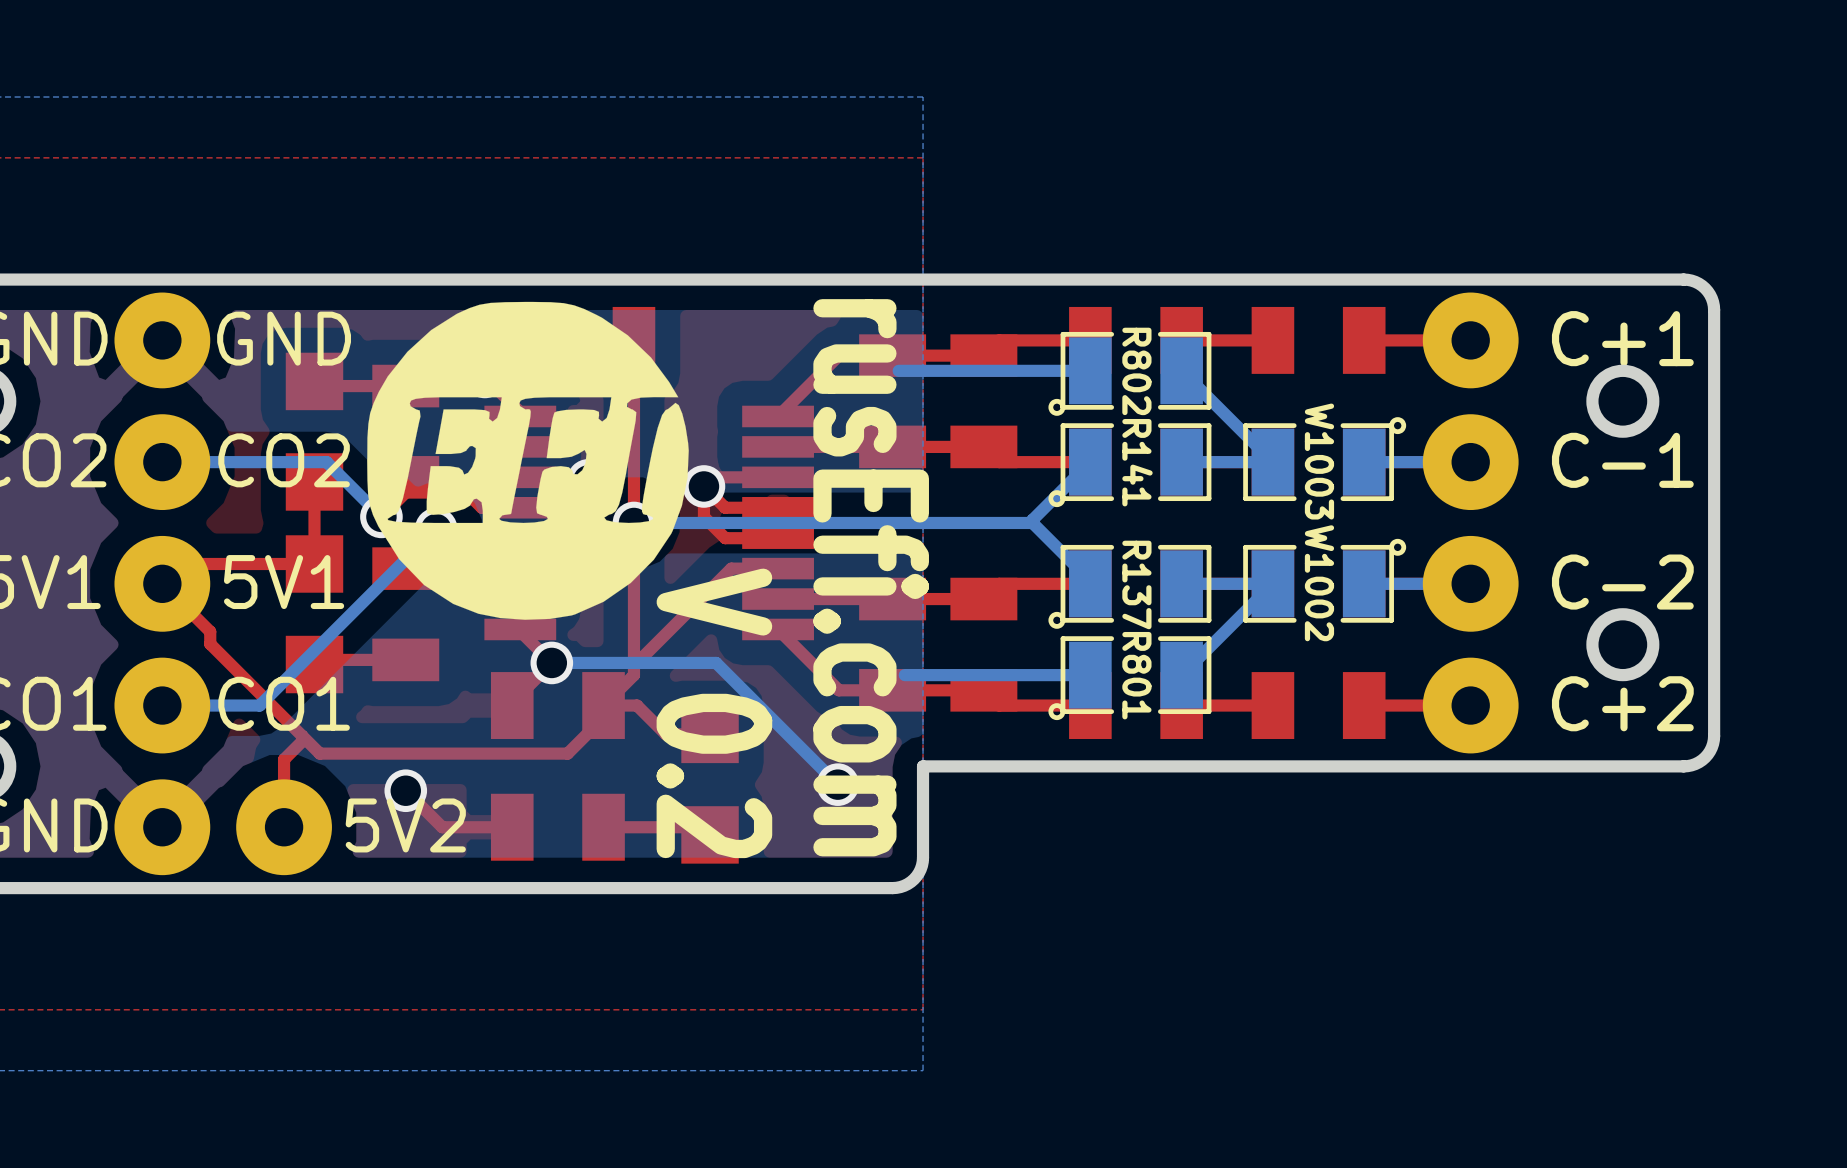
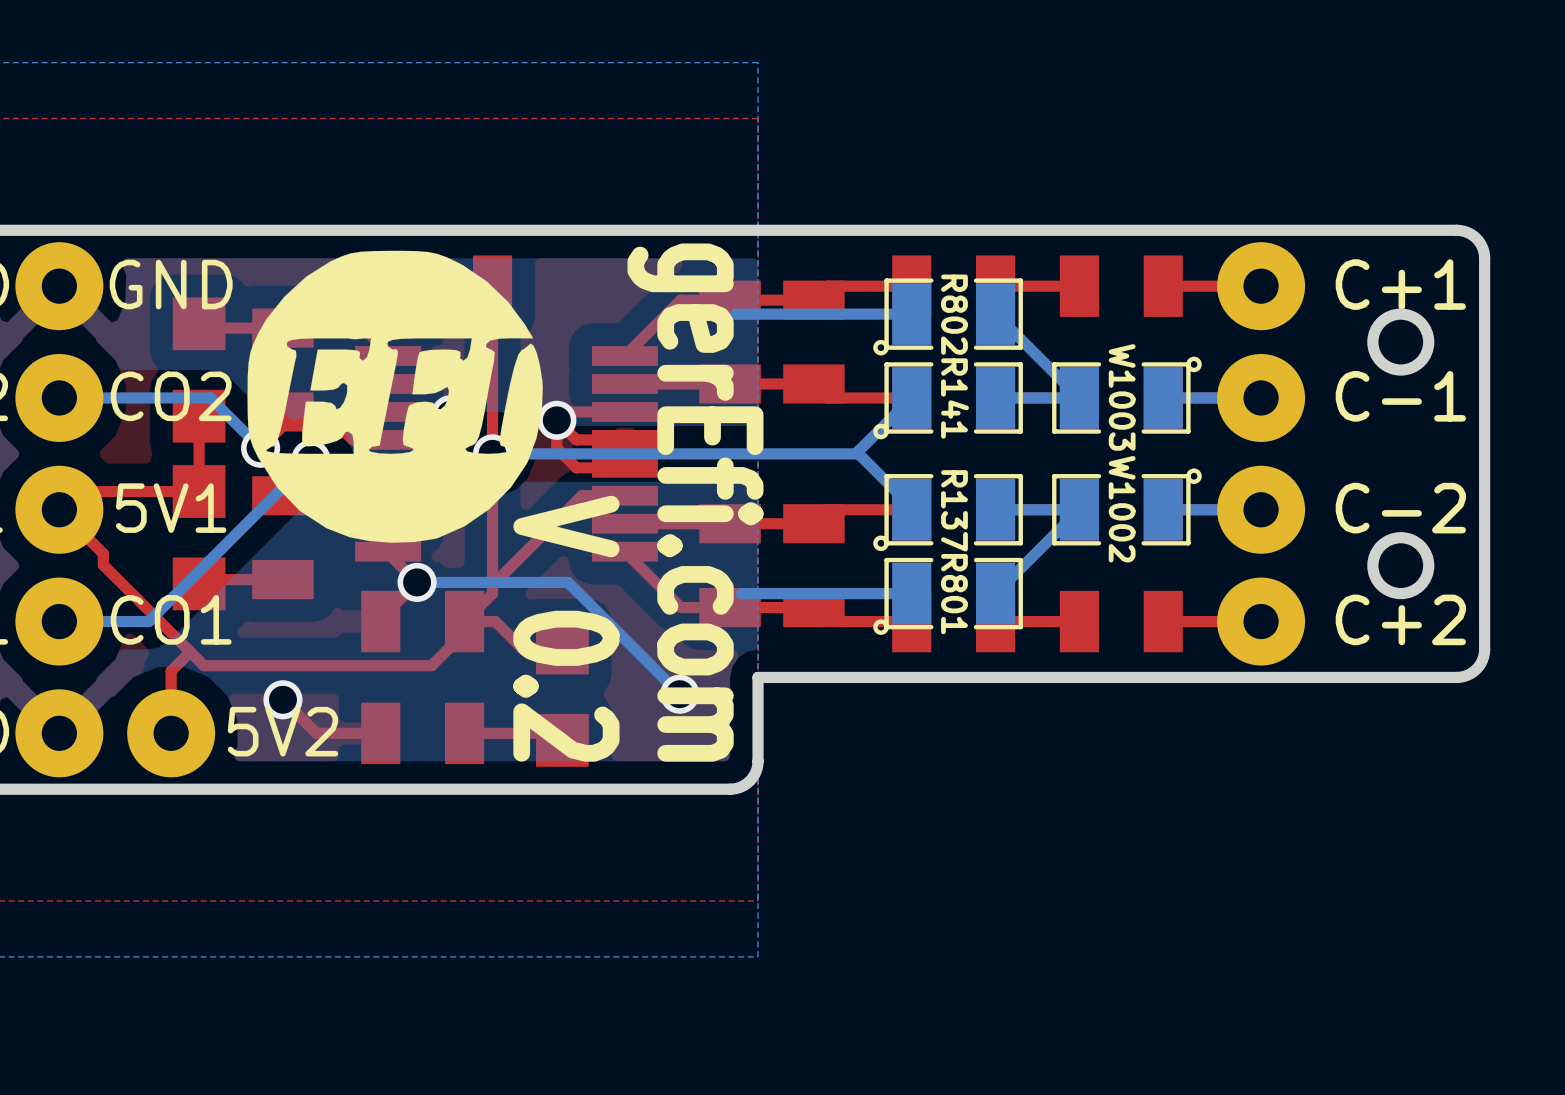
text: rusEfi.com (871, 577) -> gerEfi.com (695, 502)

